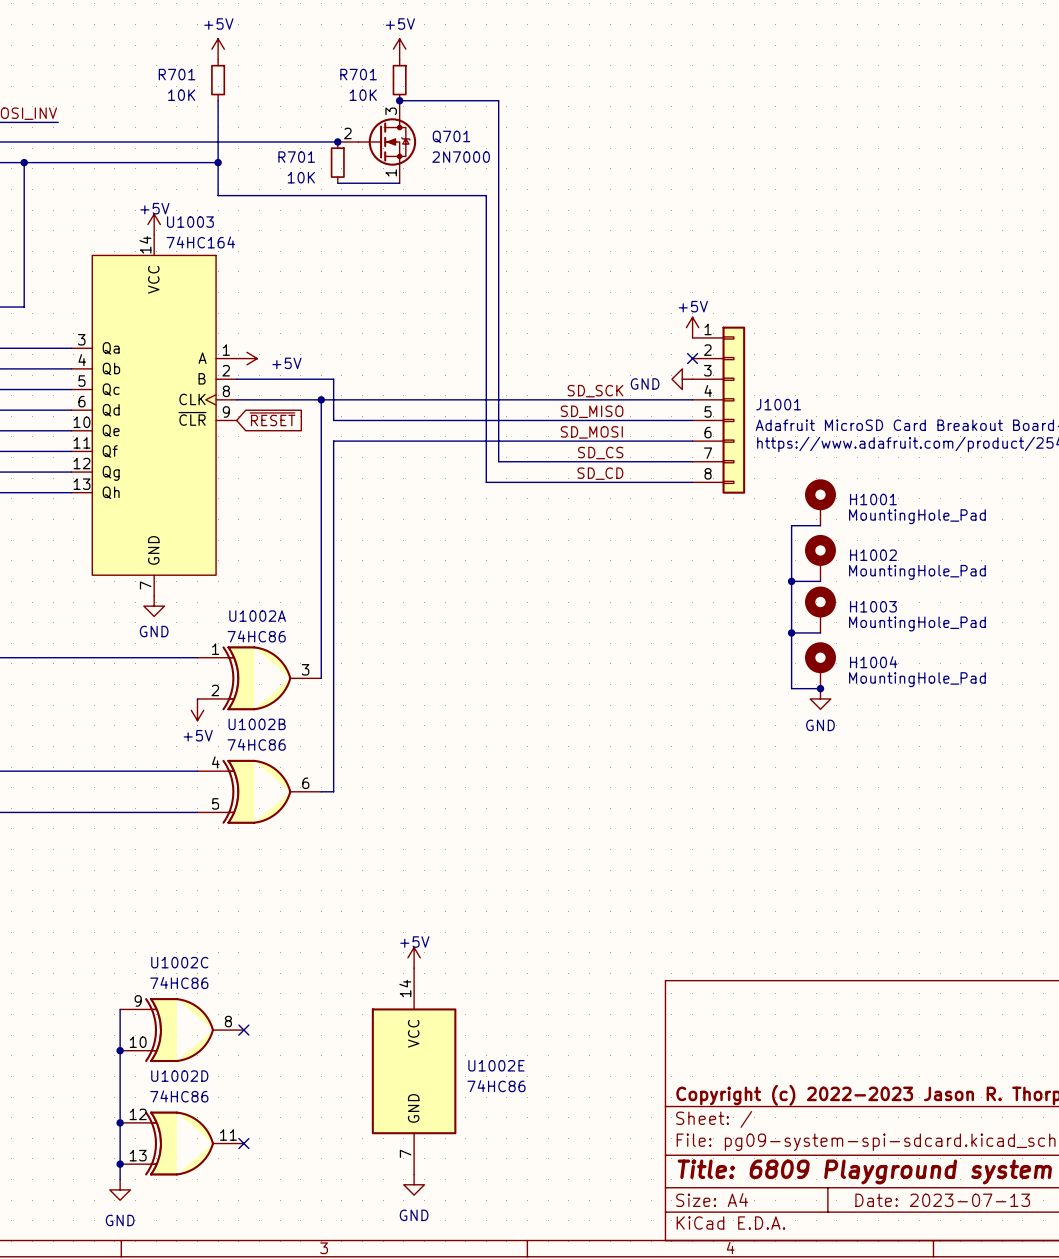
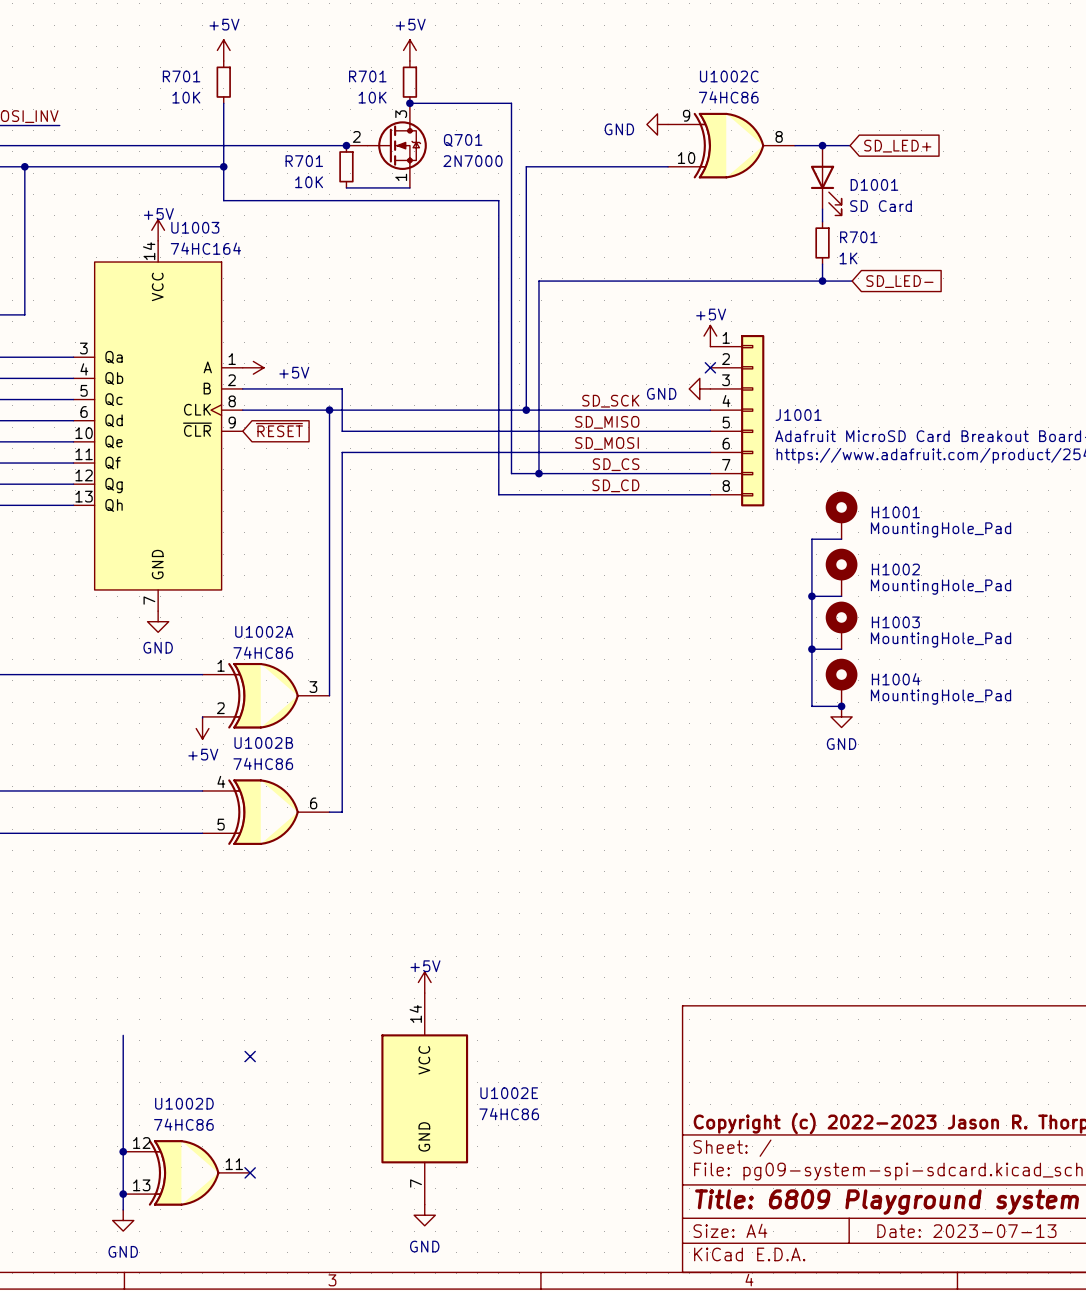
power symbol: none -> GND (657, 124)
wire: none -> (795, 145) (850, 145)
junction: none -> (822, 145)
global label: none -> SD_LED+ (897, 146)
wire: none -> (668, 166) (526, 166) (526, 410)
D1001: none -> SD Card (826, 180)
wire: none -> (822, 209) (822, 221)
R701: none -> 1K (822, 242)
wire: none -> (822, 264) (822, 281)
junction: none -> (822, 281)
wire: none -> (852, 281) (538, 281) (538, 473)
global label: none -> SD_LED- (899, 281)
junction: none -> (526, 410)
junction: none -> (538, 473)
U1002C position: (182, 1030) -> (731, 145)
junction: (120, 1050) -> none

